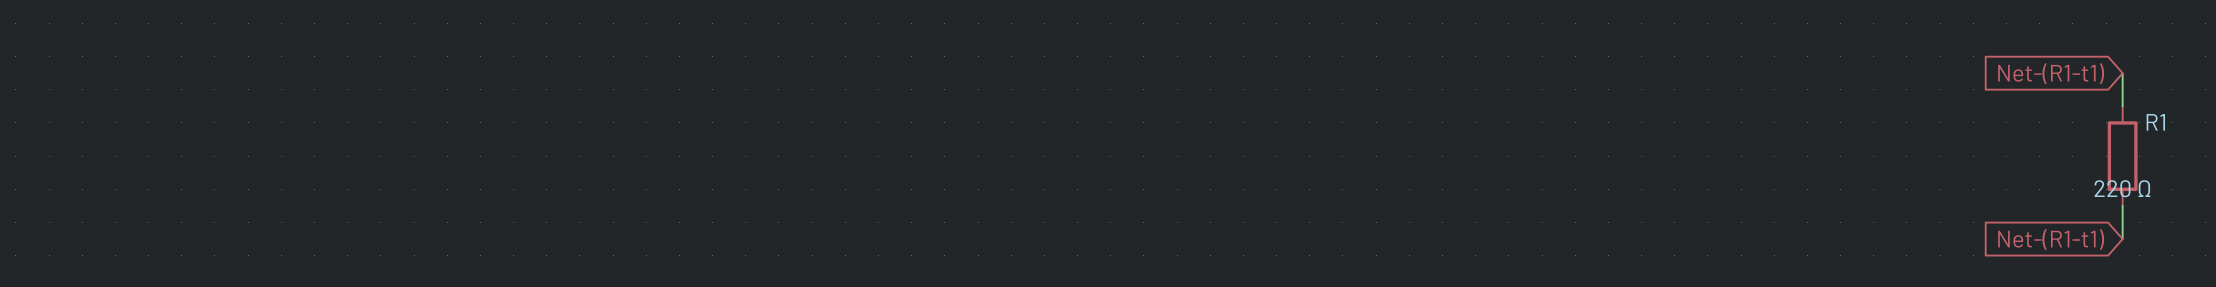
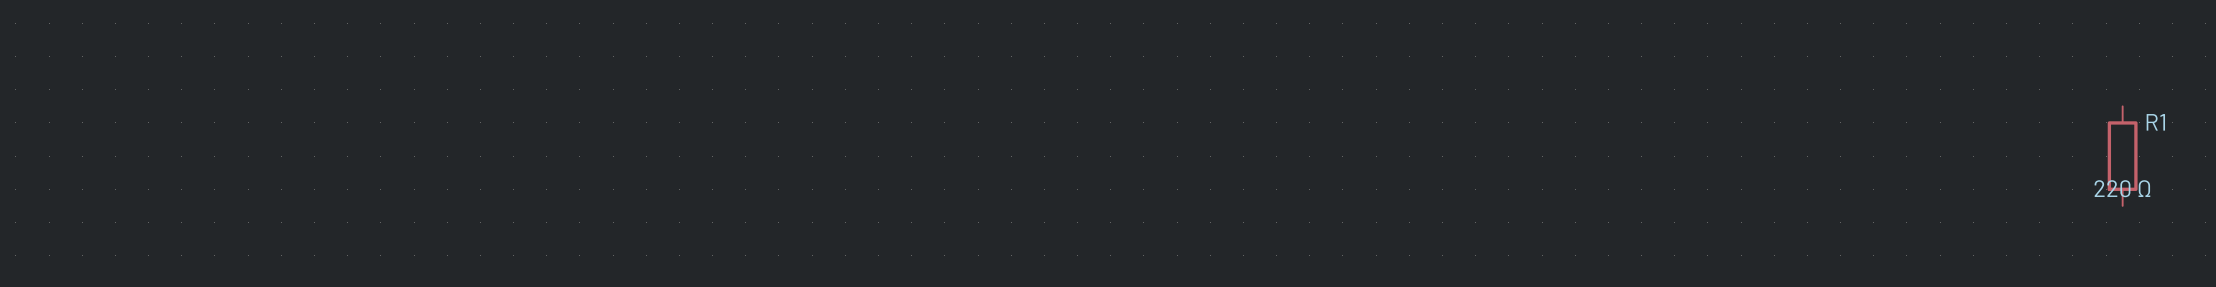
global label: Net-(R1-t1) (2051, 73) -> none
wire: (2122, 73) (2122, 106) -> none
wire: (2122, 205) (2122, 239) -> none
global label: Net-(R1-t1) (2051, 239) -> none

